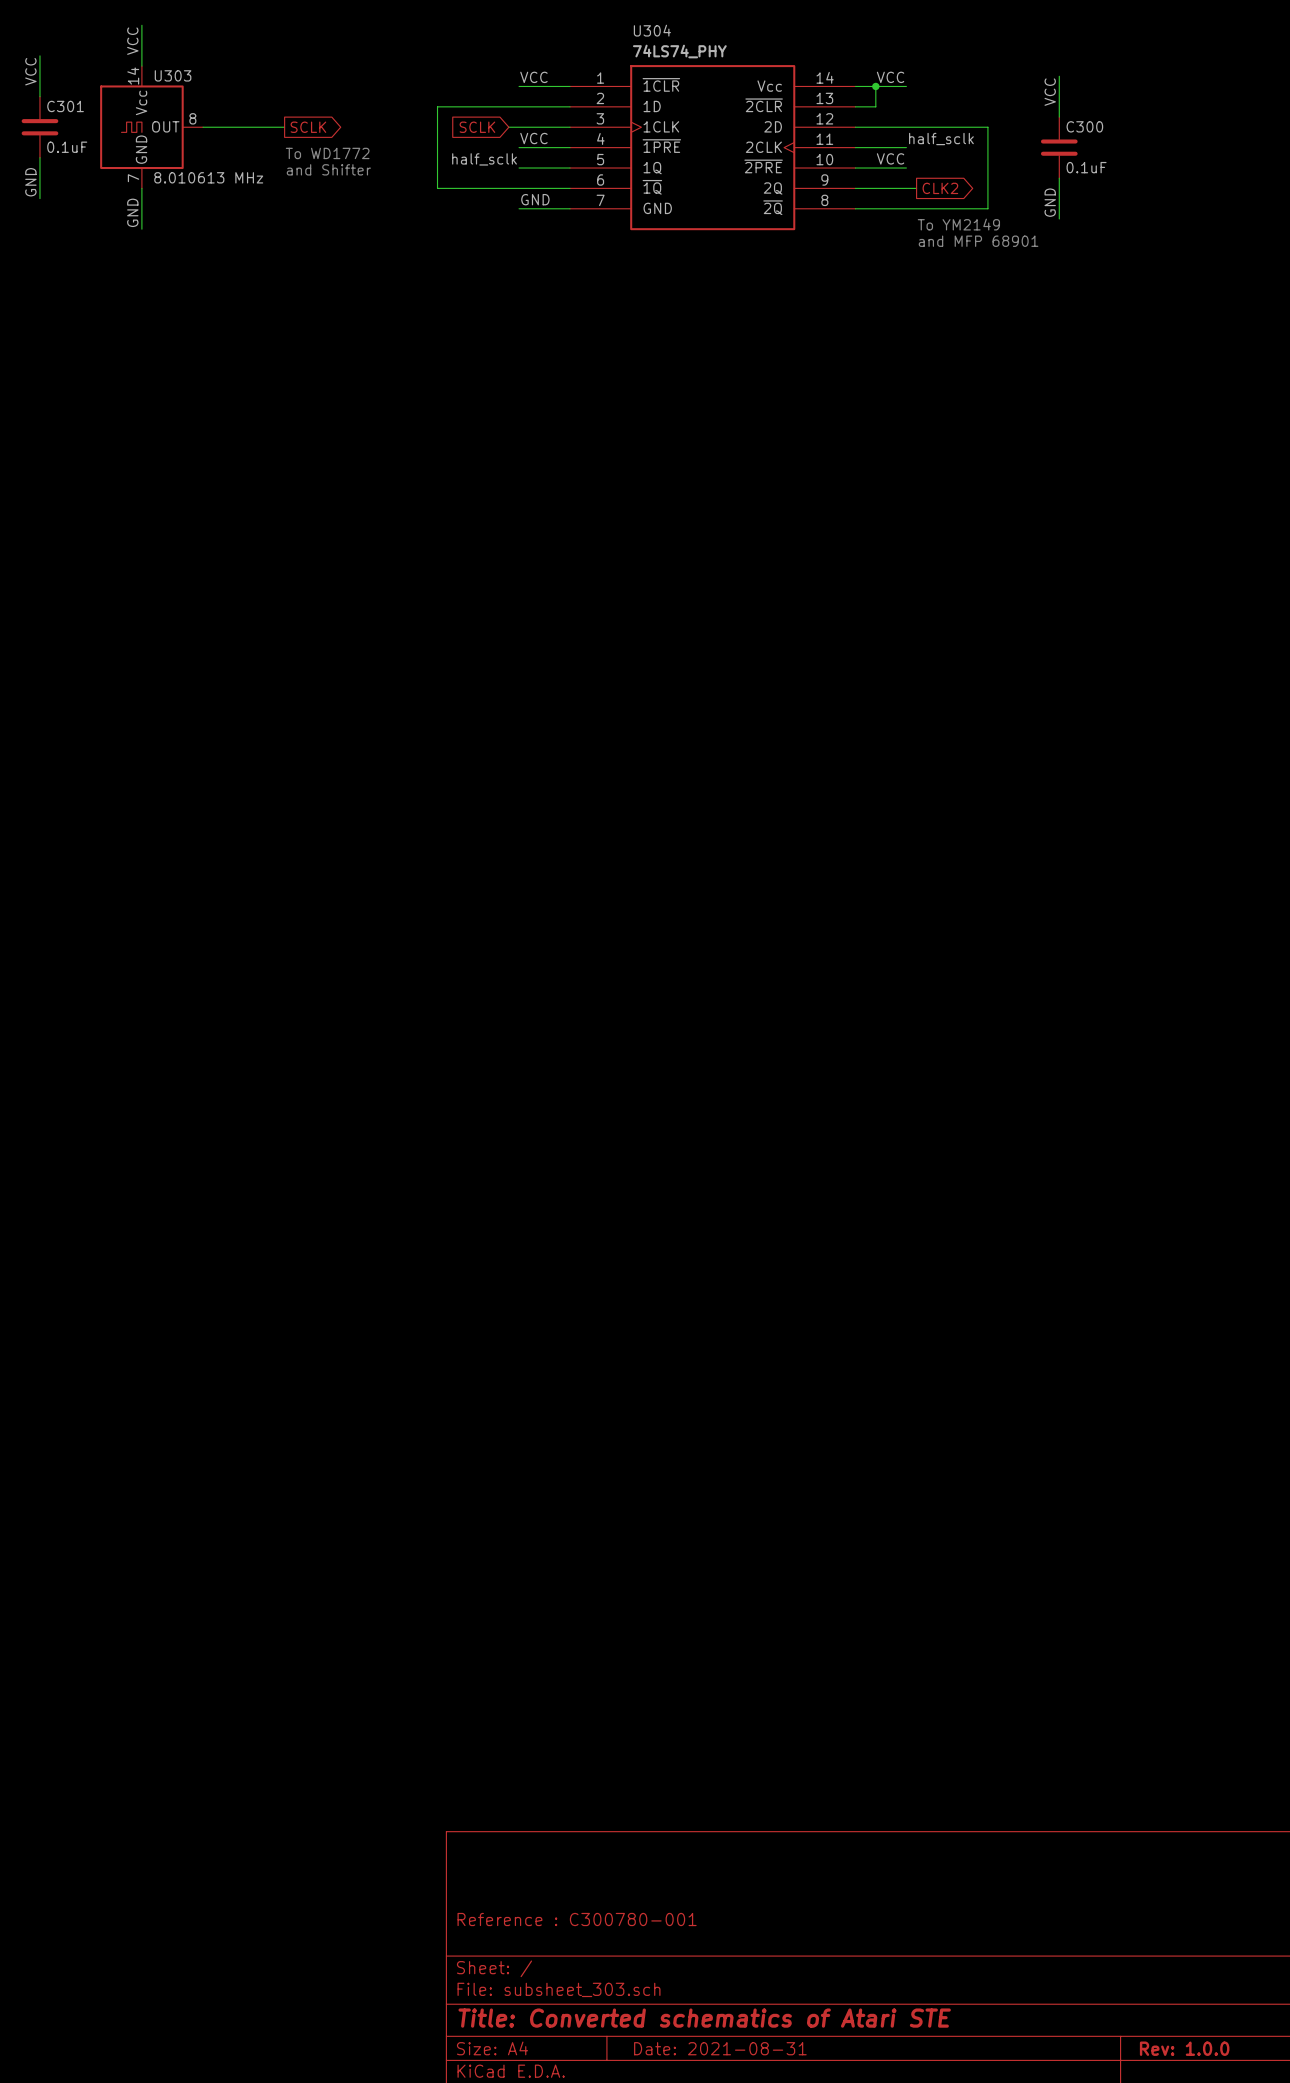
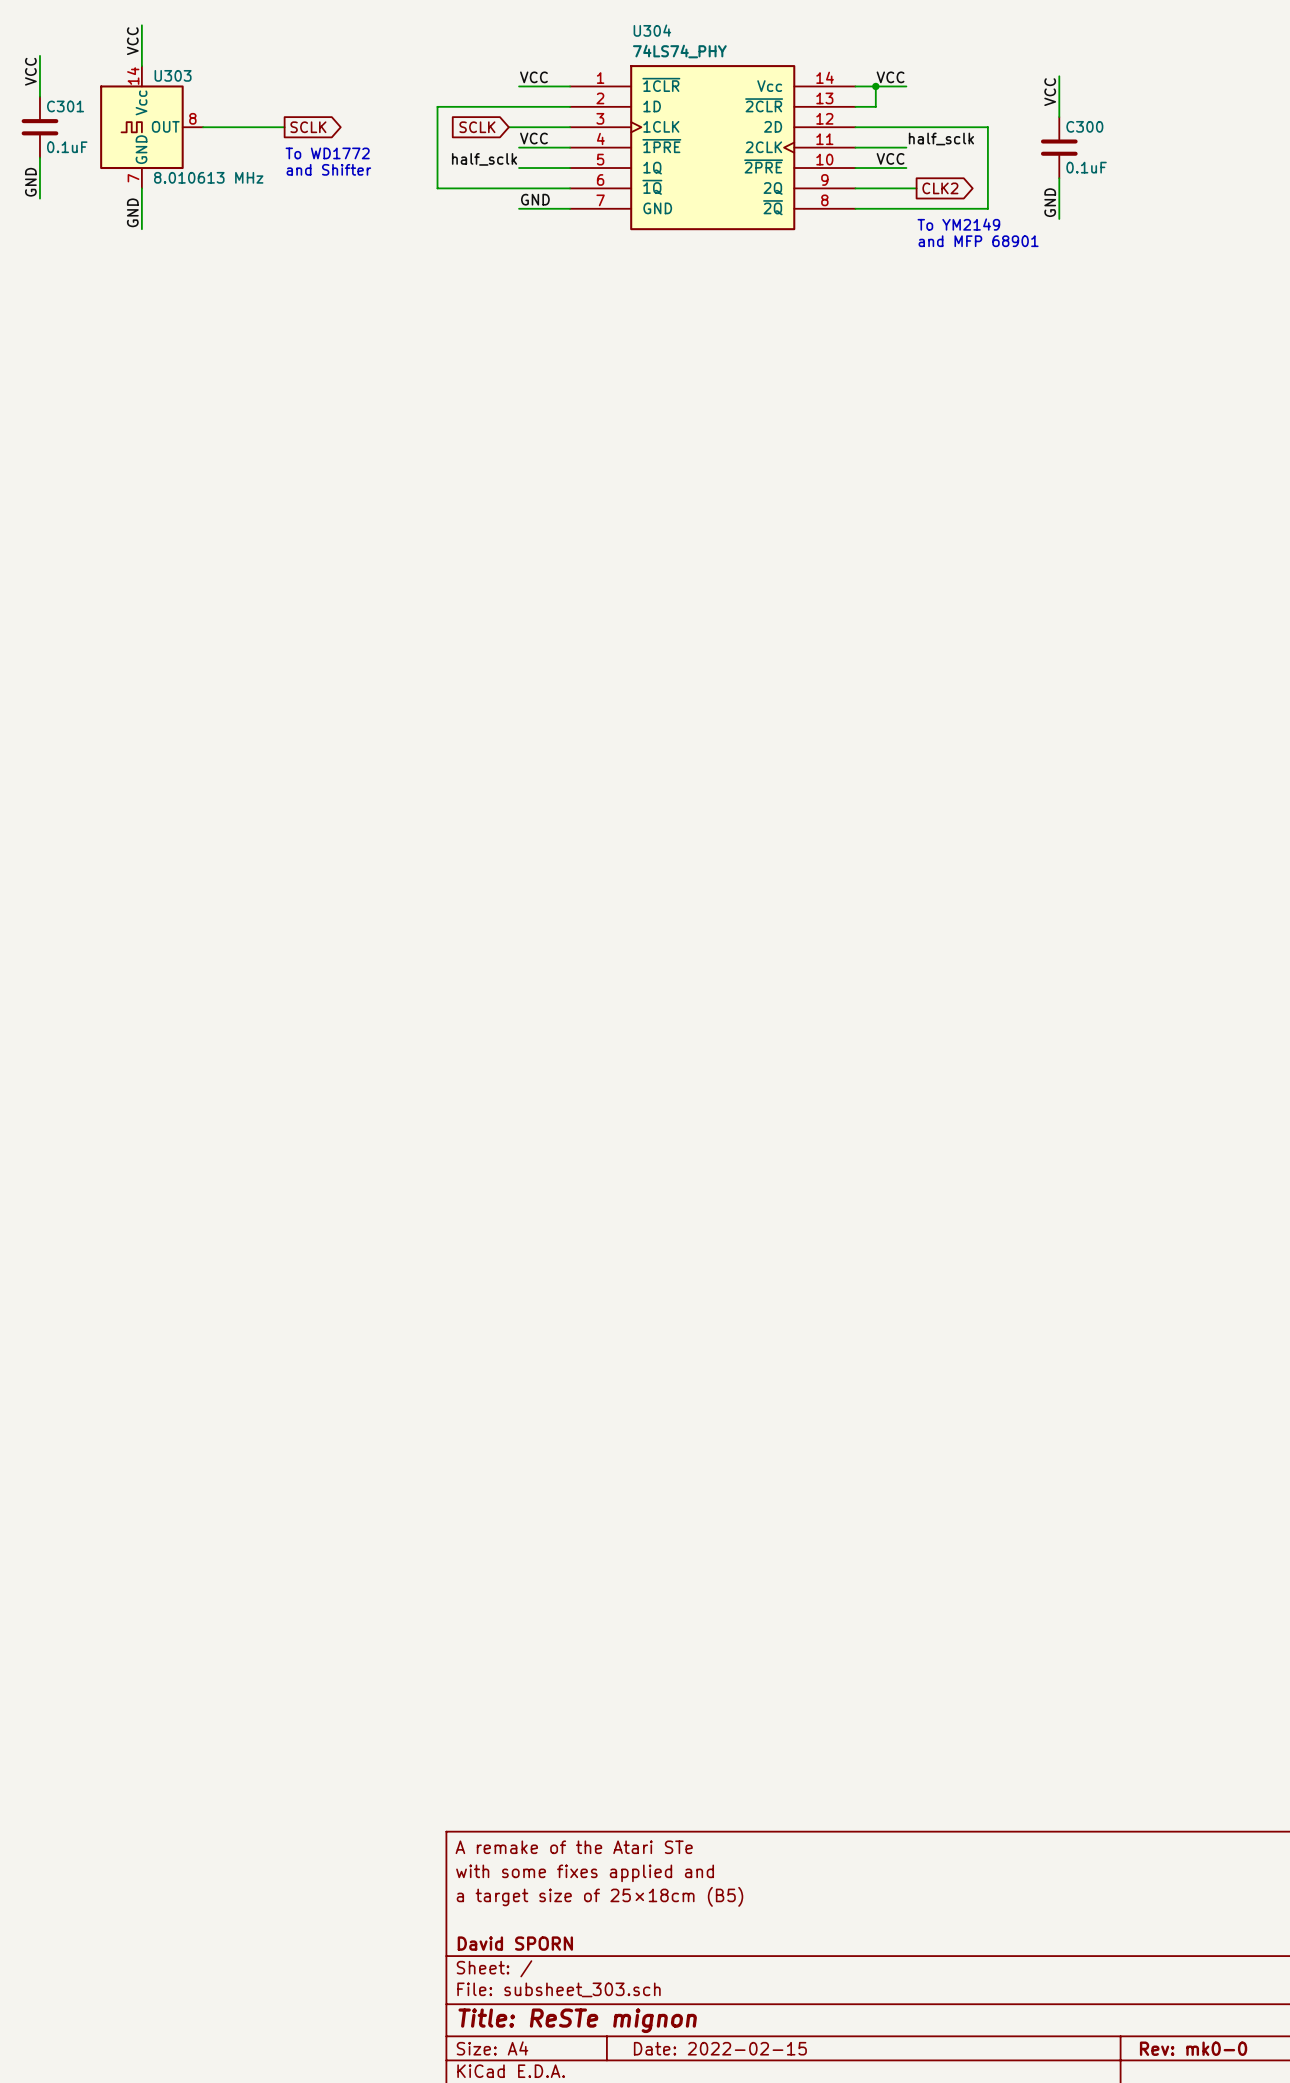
title block: none -> A remake of the Atari STe (574, 1847)
title block: none -> with some fixes applied and (585, 1873)
title block: none -> a target size of 25×18cm (B5) (599, 1896)
title block: Reference : C300780-001 (577, 1919) -> none
title block: none -> David SPORN (515, 1943)
title block: Title: Converted schematics of Atari STE (704, 2018) -> Title: ReSTe mignon (577, 2020)
title block: Date: 2021-08-31 (720, 2048) -> Date: 2022-02-15 (720, 2048)
title block: Rev: 1.0.0 (1184, 2048) -> Rev: mk0-0 (1193, 2048)

